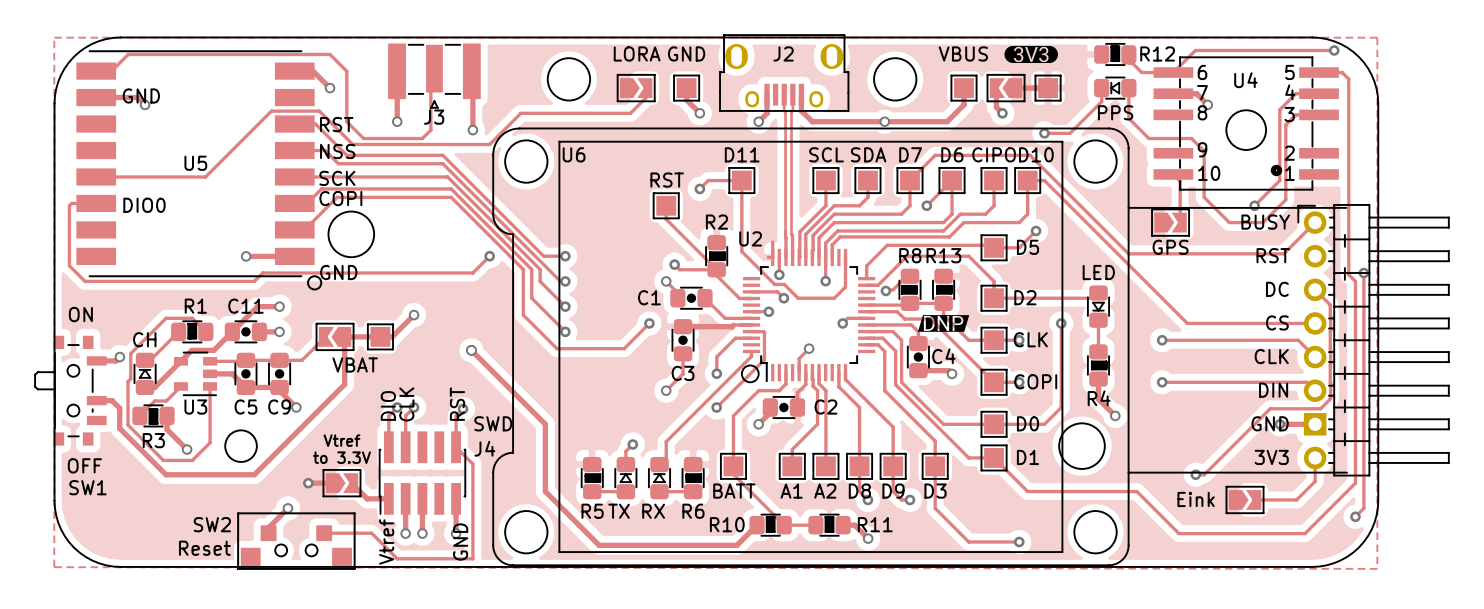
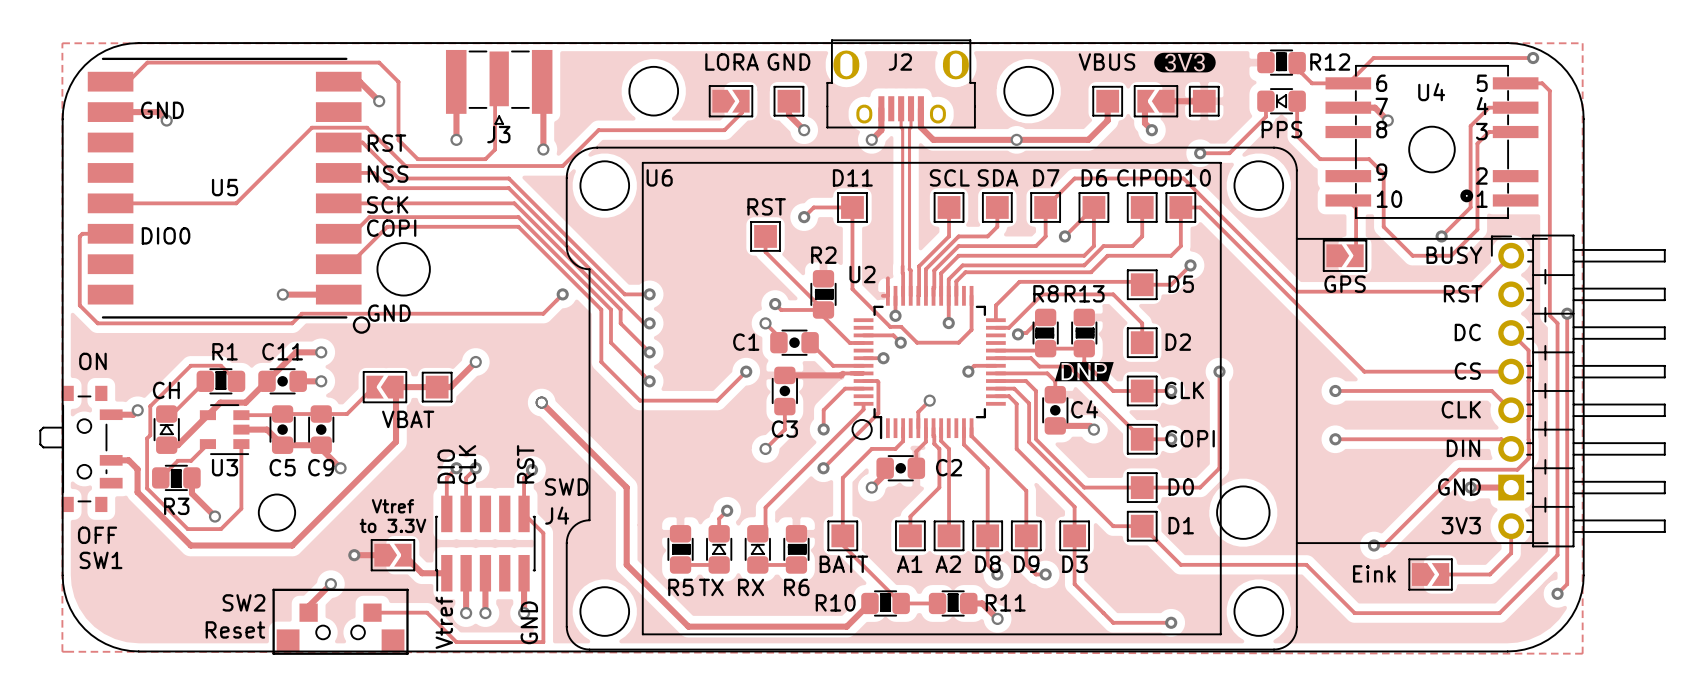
track: (1098, 293) (1093, 298) (994, 298) -> none
LED: (1098, 306) -> none
track: (1098, 320) (1098, 351) -> none
R4: (1098, 365) -> none
track: (1098, 379) (1098, 399) (1115, 415) -> none
via: (1115, 415) -> none

